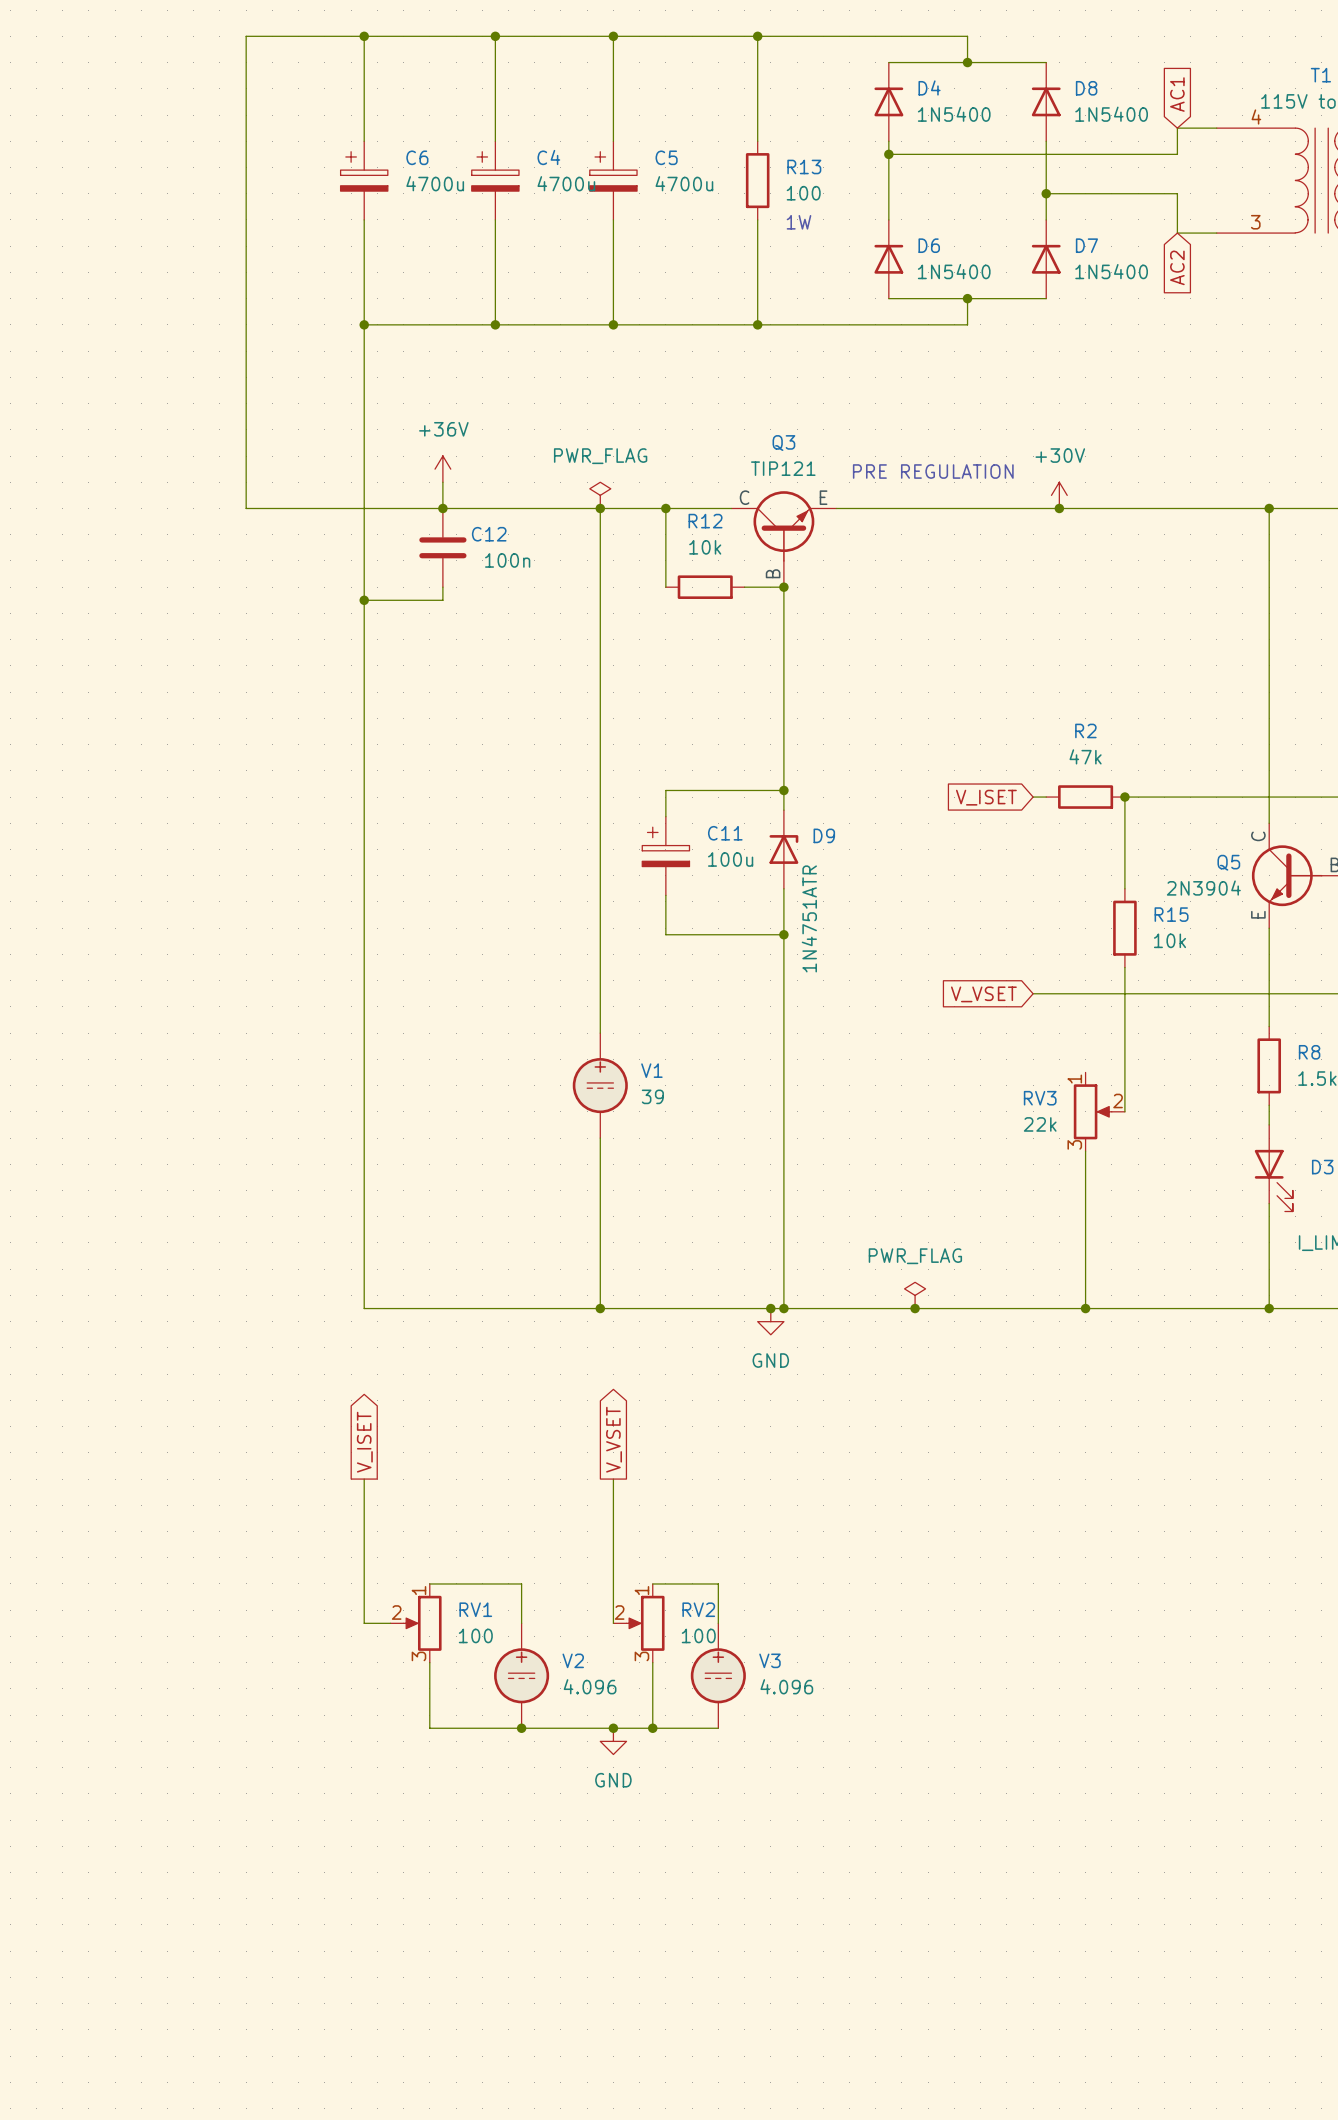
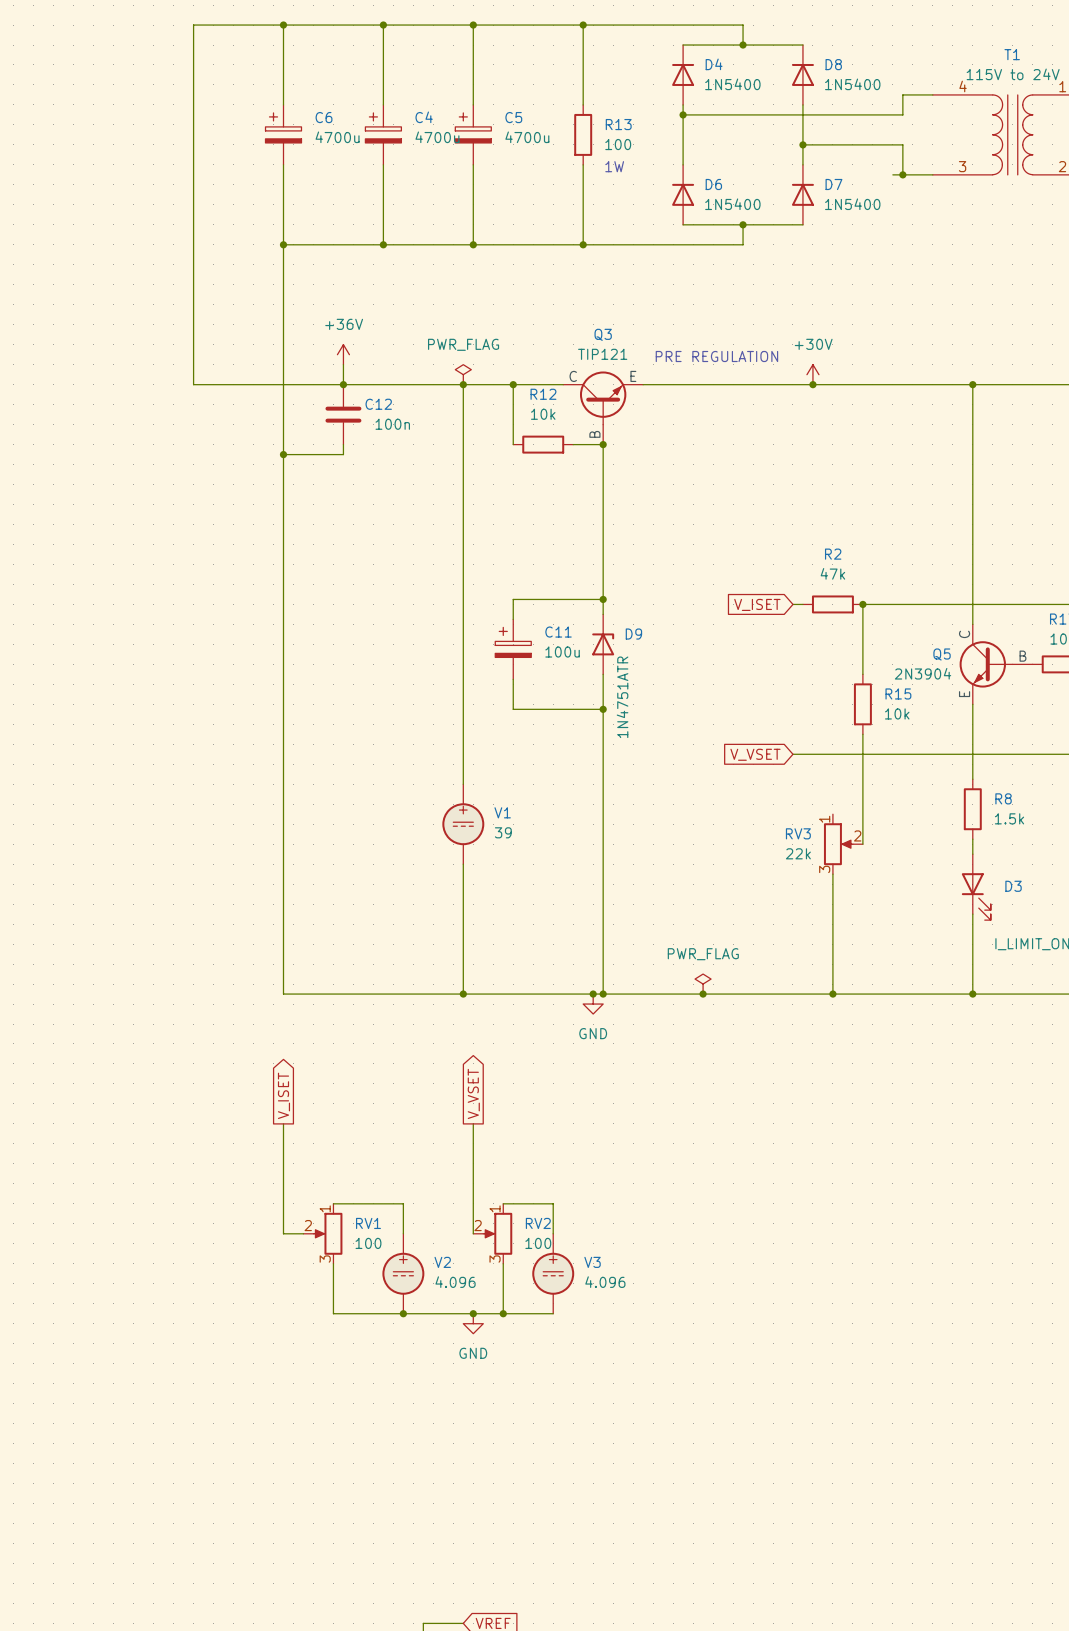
global label: AC1 (1177, 94) -> none
wire: none -> (892, 174) (902, 174)
junction: none -> (902, 174)
global label: AC2 (1177, 267) -> none

